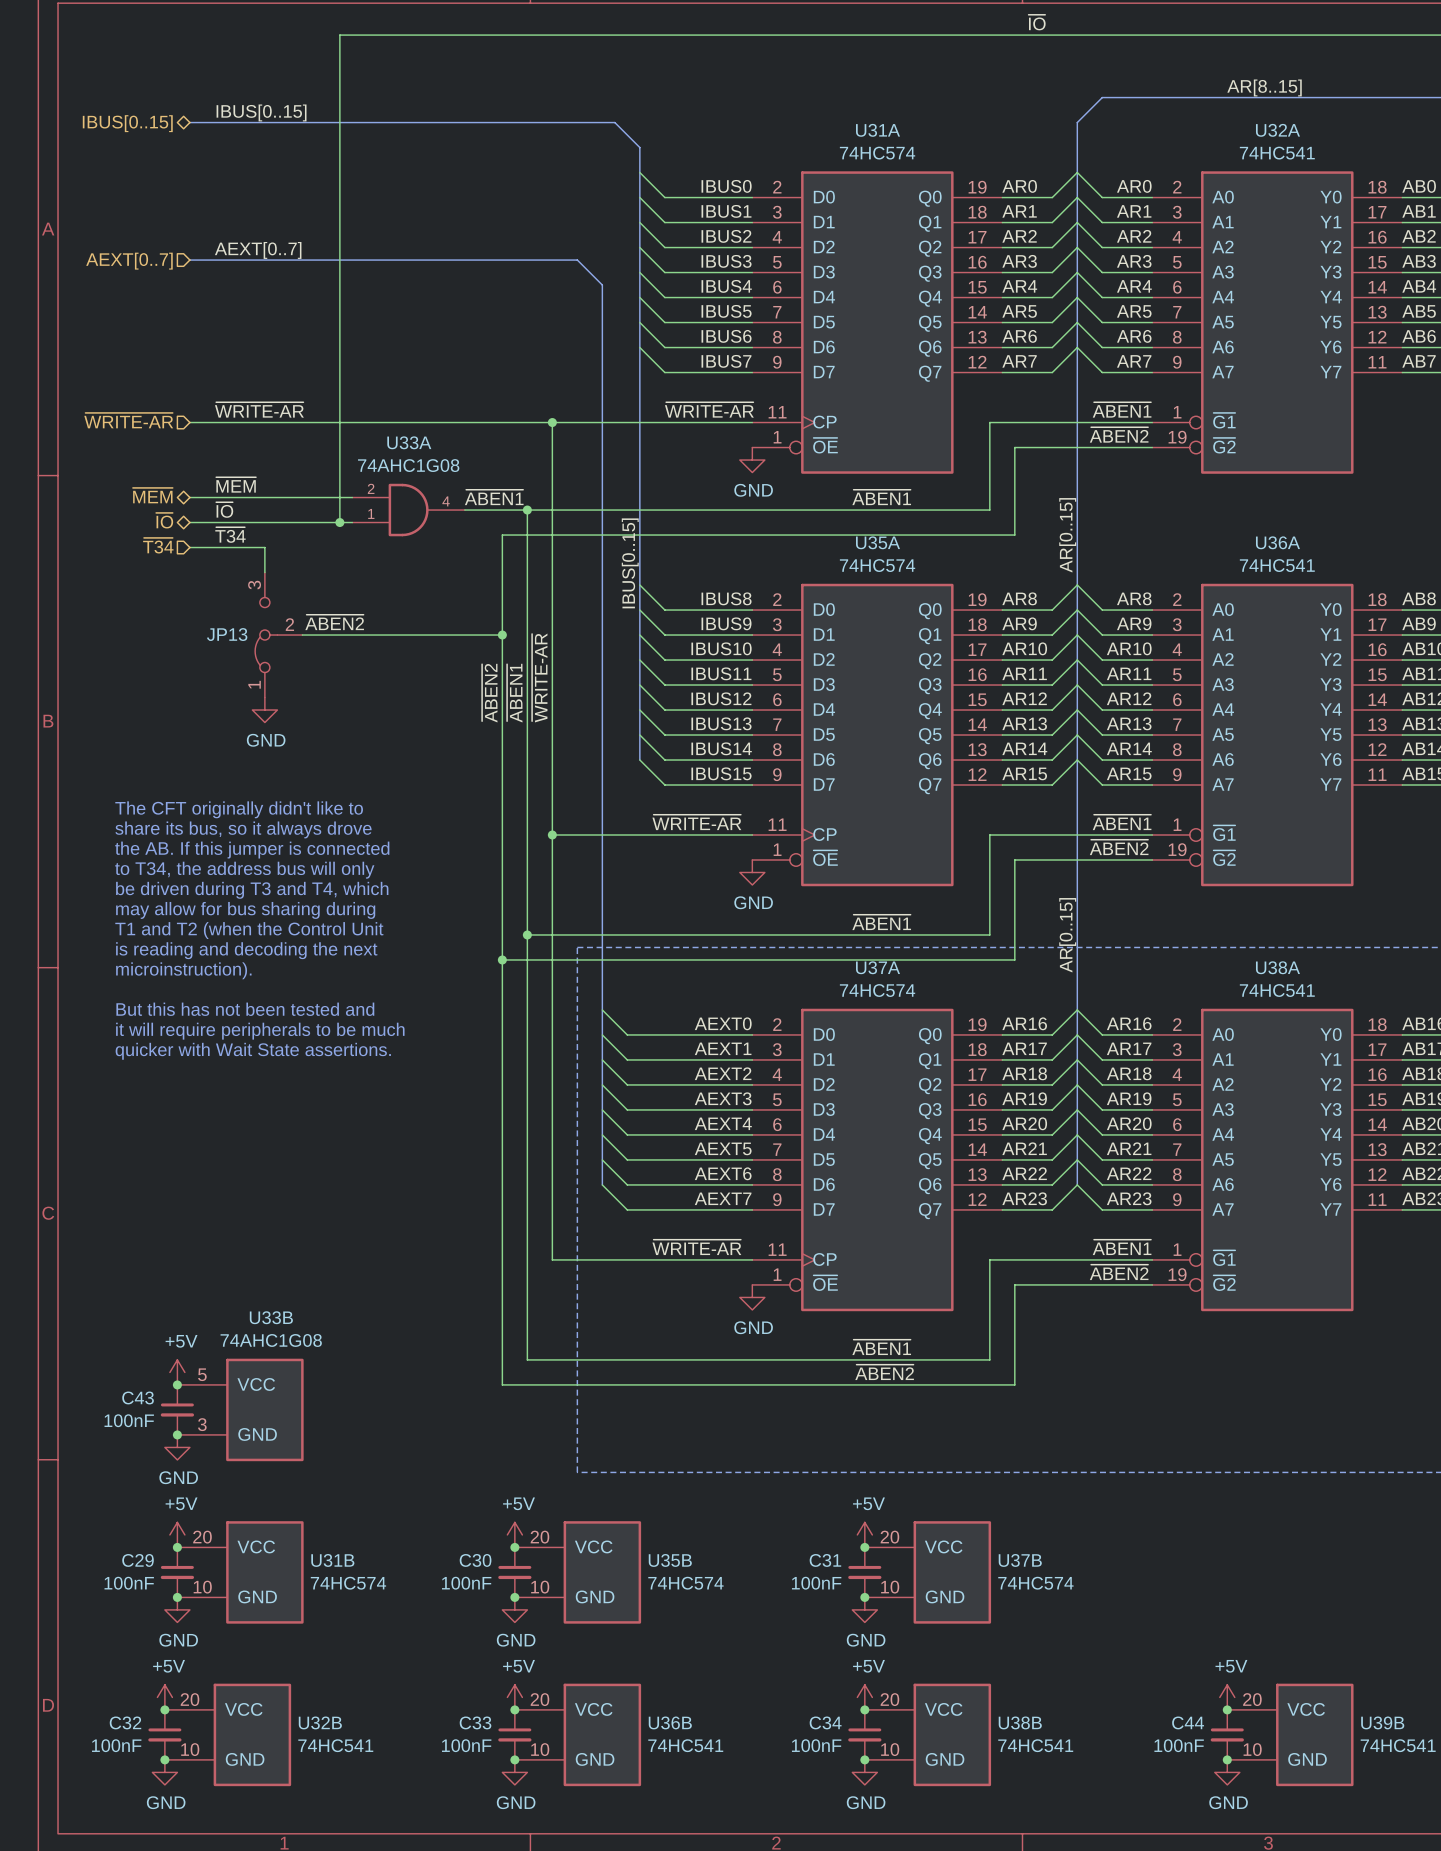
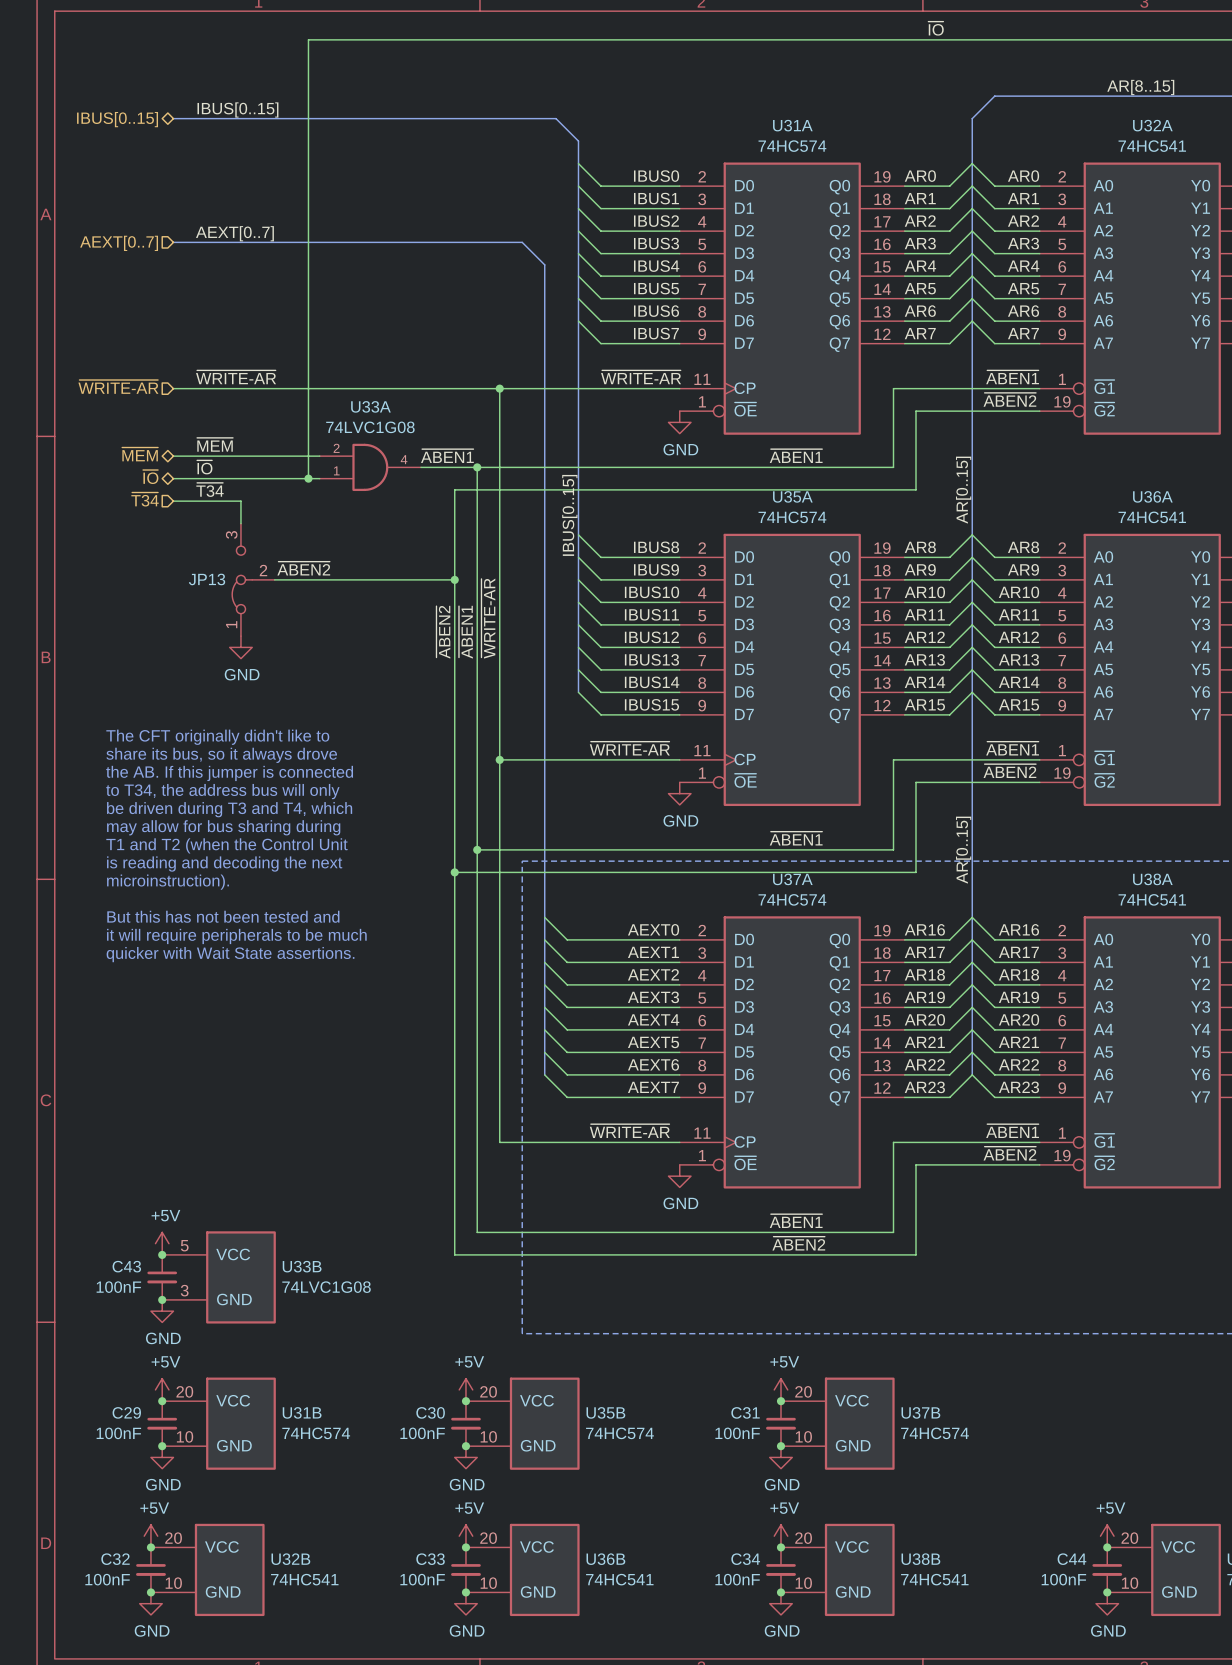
U33A value: 74AHC1G08 (408, 465) -> 74LVC1G08 (370, 427)
U33B name position: U33B (271, 1317) -> U33B (302, 1266)
U33B value: 74AHC1G08 (271, 1340) -> 74LVC1G08 (326, 1287)

